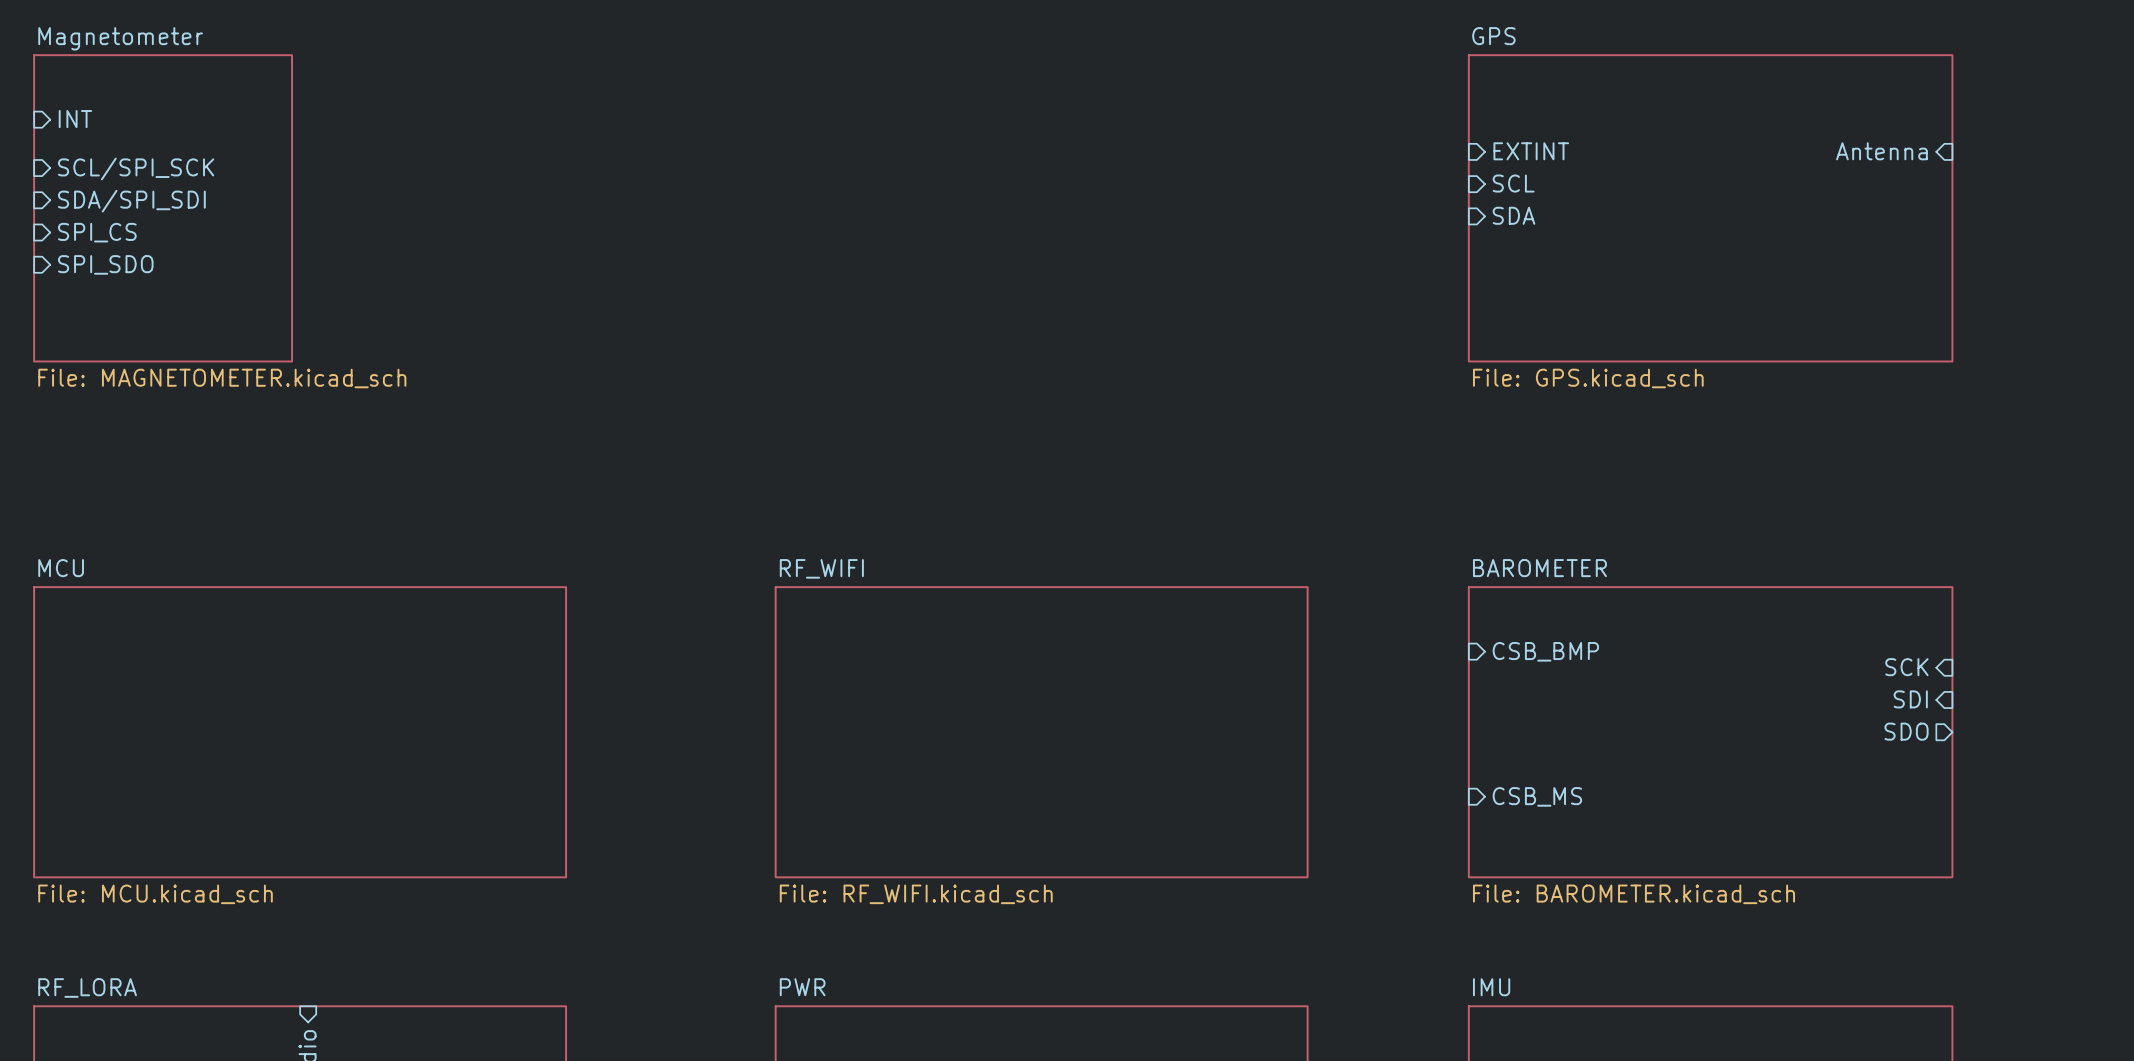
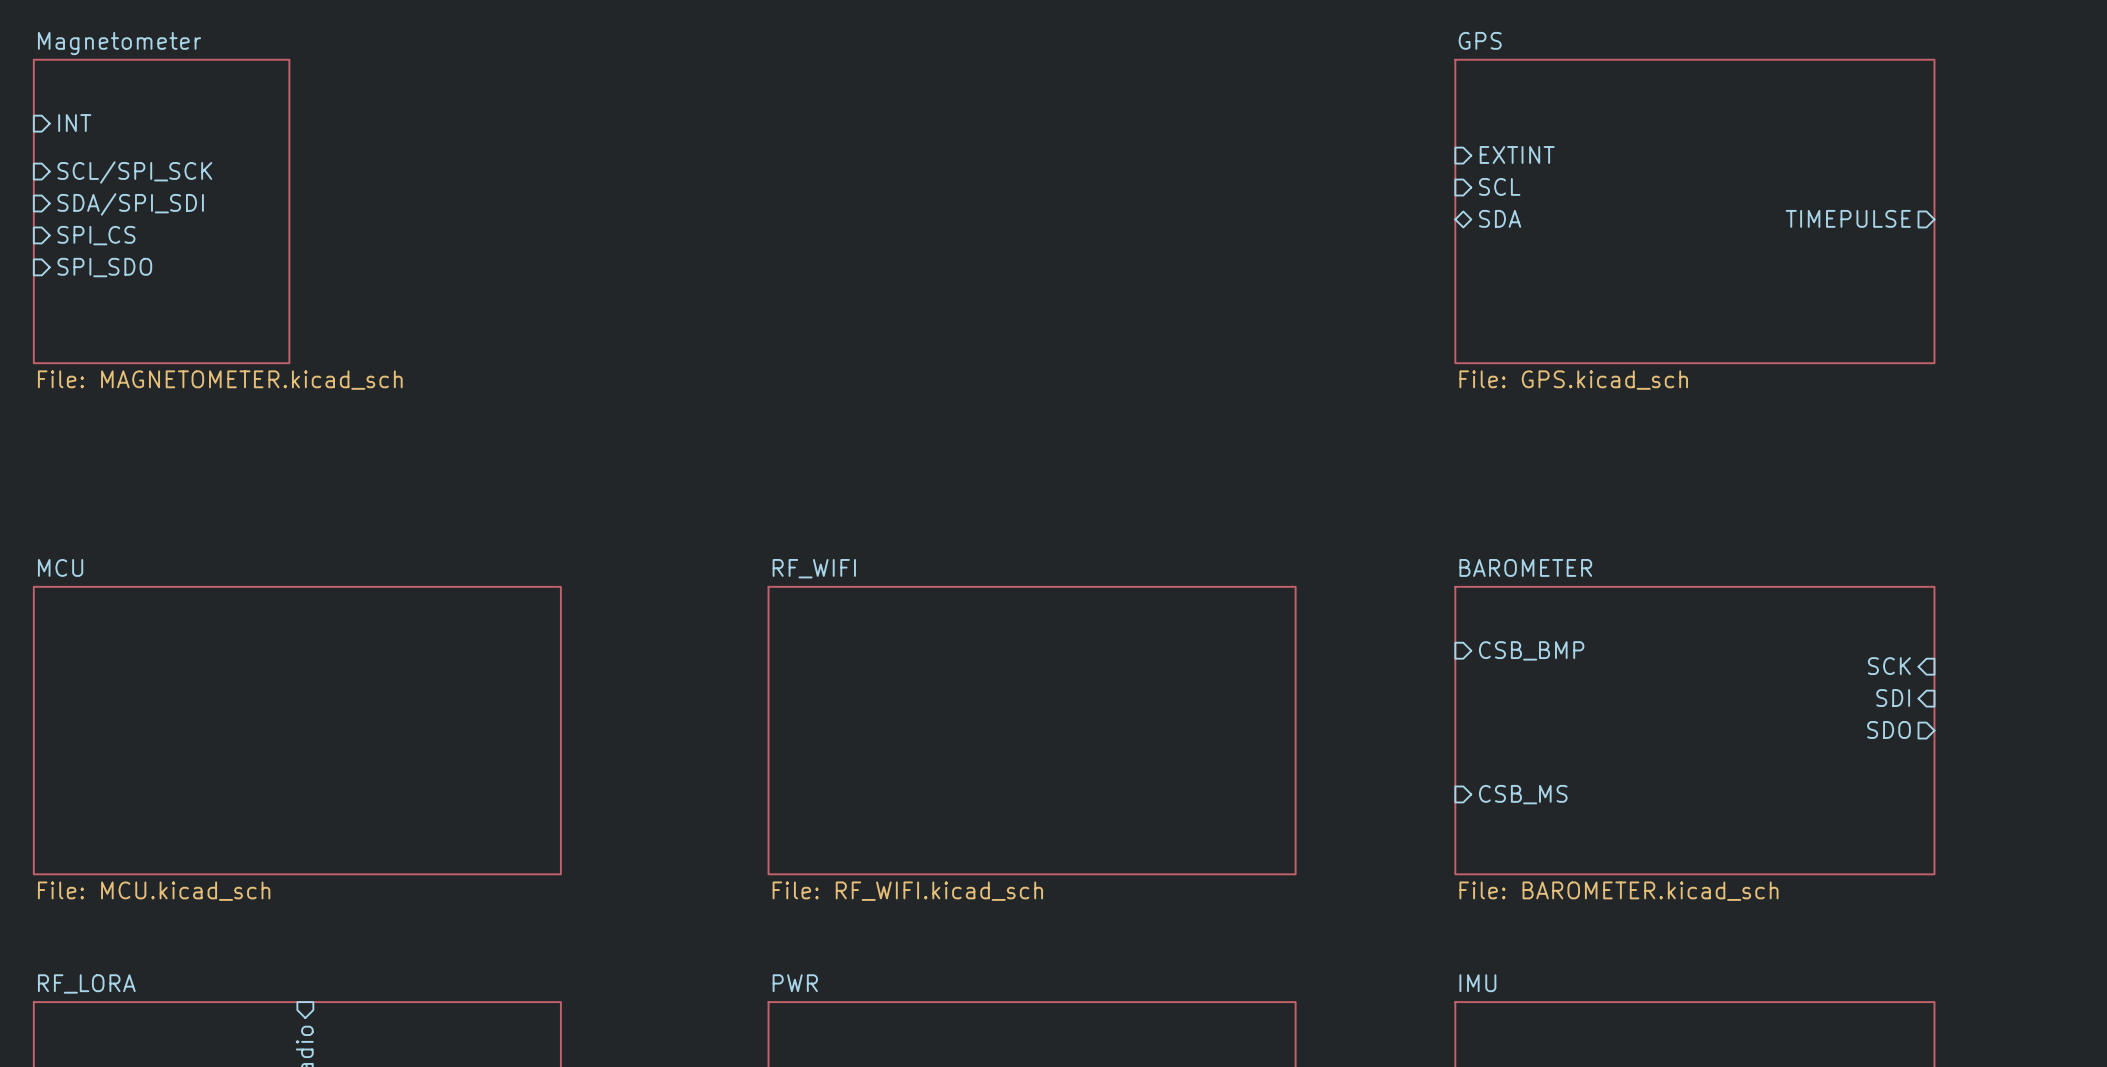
sheet pin: Antenna (1881, 151) -> none
sheet pin shape: input (1513, 215) -> bidirectional (1500, 218)
sheet pin: none -> TIMEPULSE (1848, 218)

